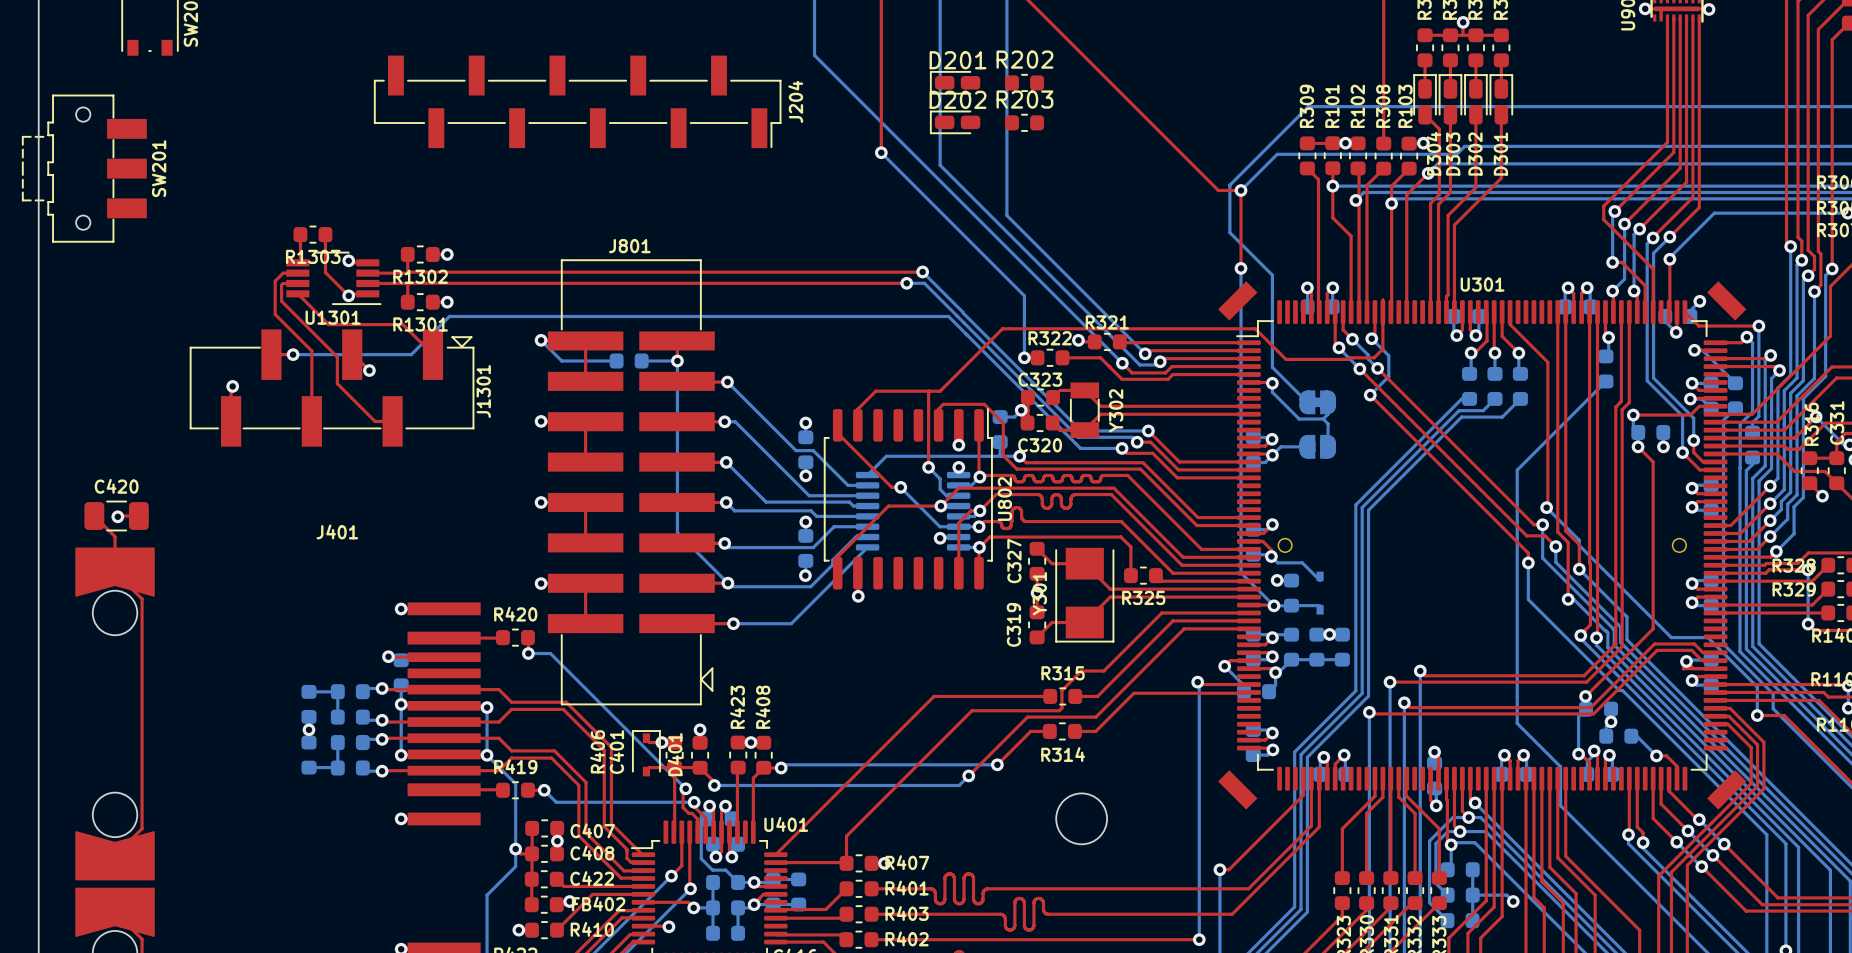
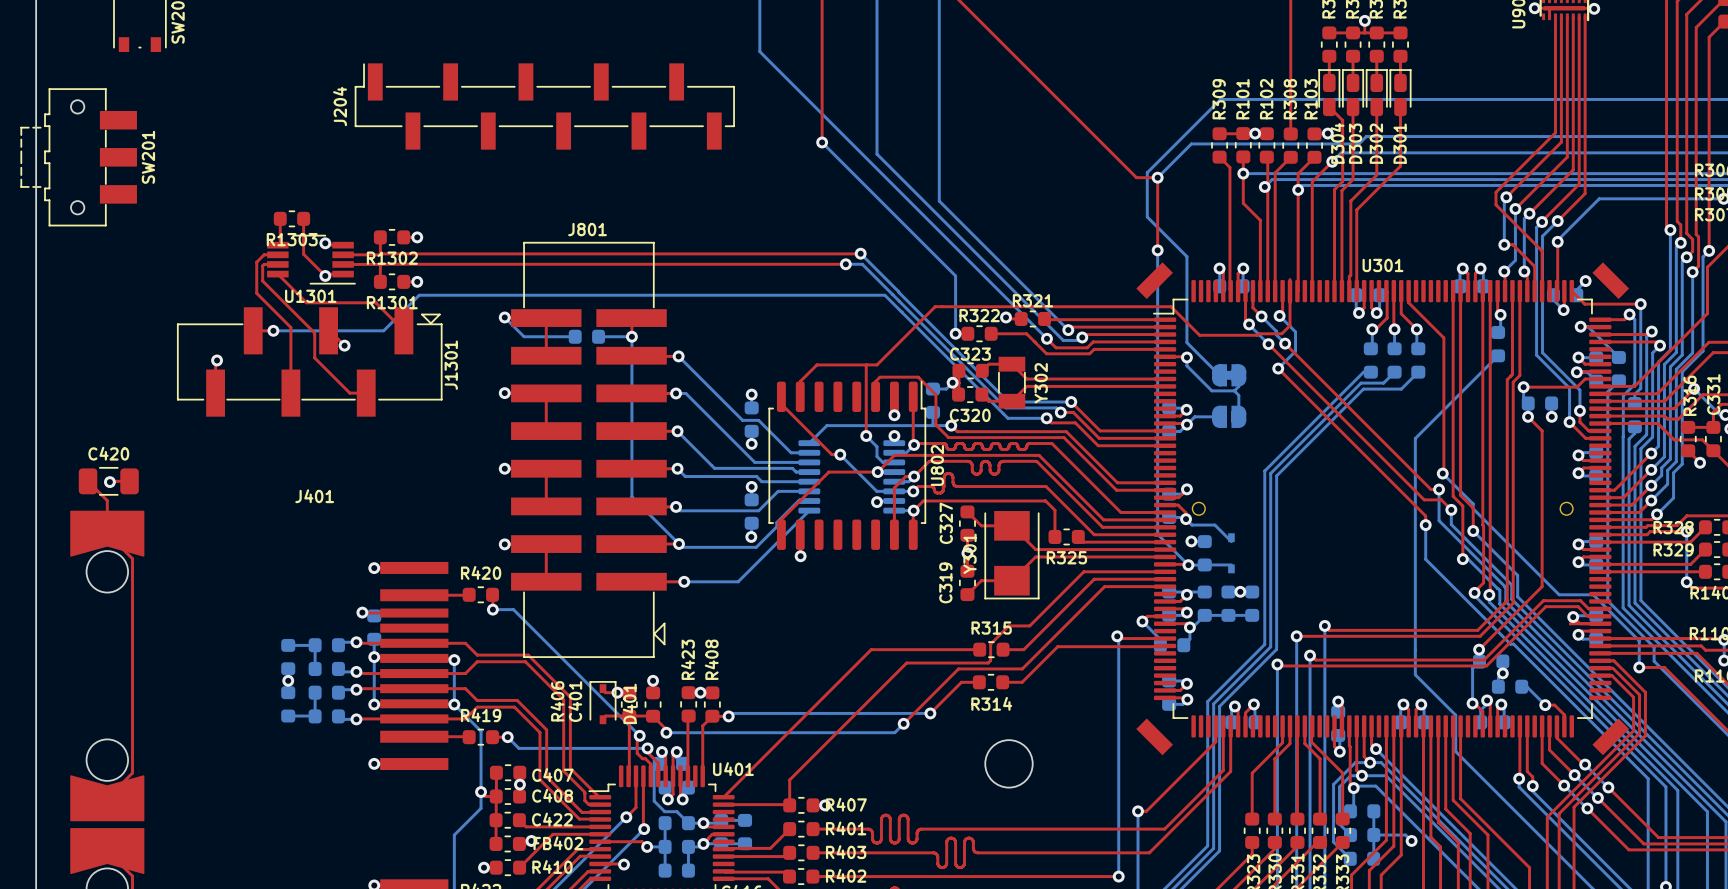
D201: (955, 82) -> none
R202: (1024, 82) -> none
J204 rotation: 0° (577, 101) -> 180° (544, 106)
D202: (955, 122) -> none
R203: (1024, 122) -> none

